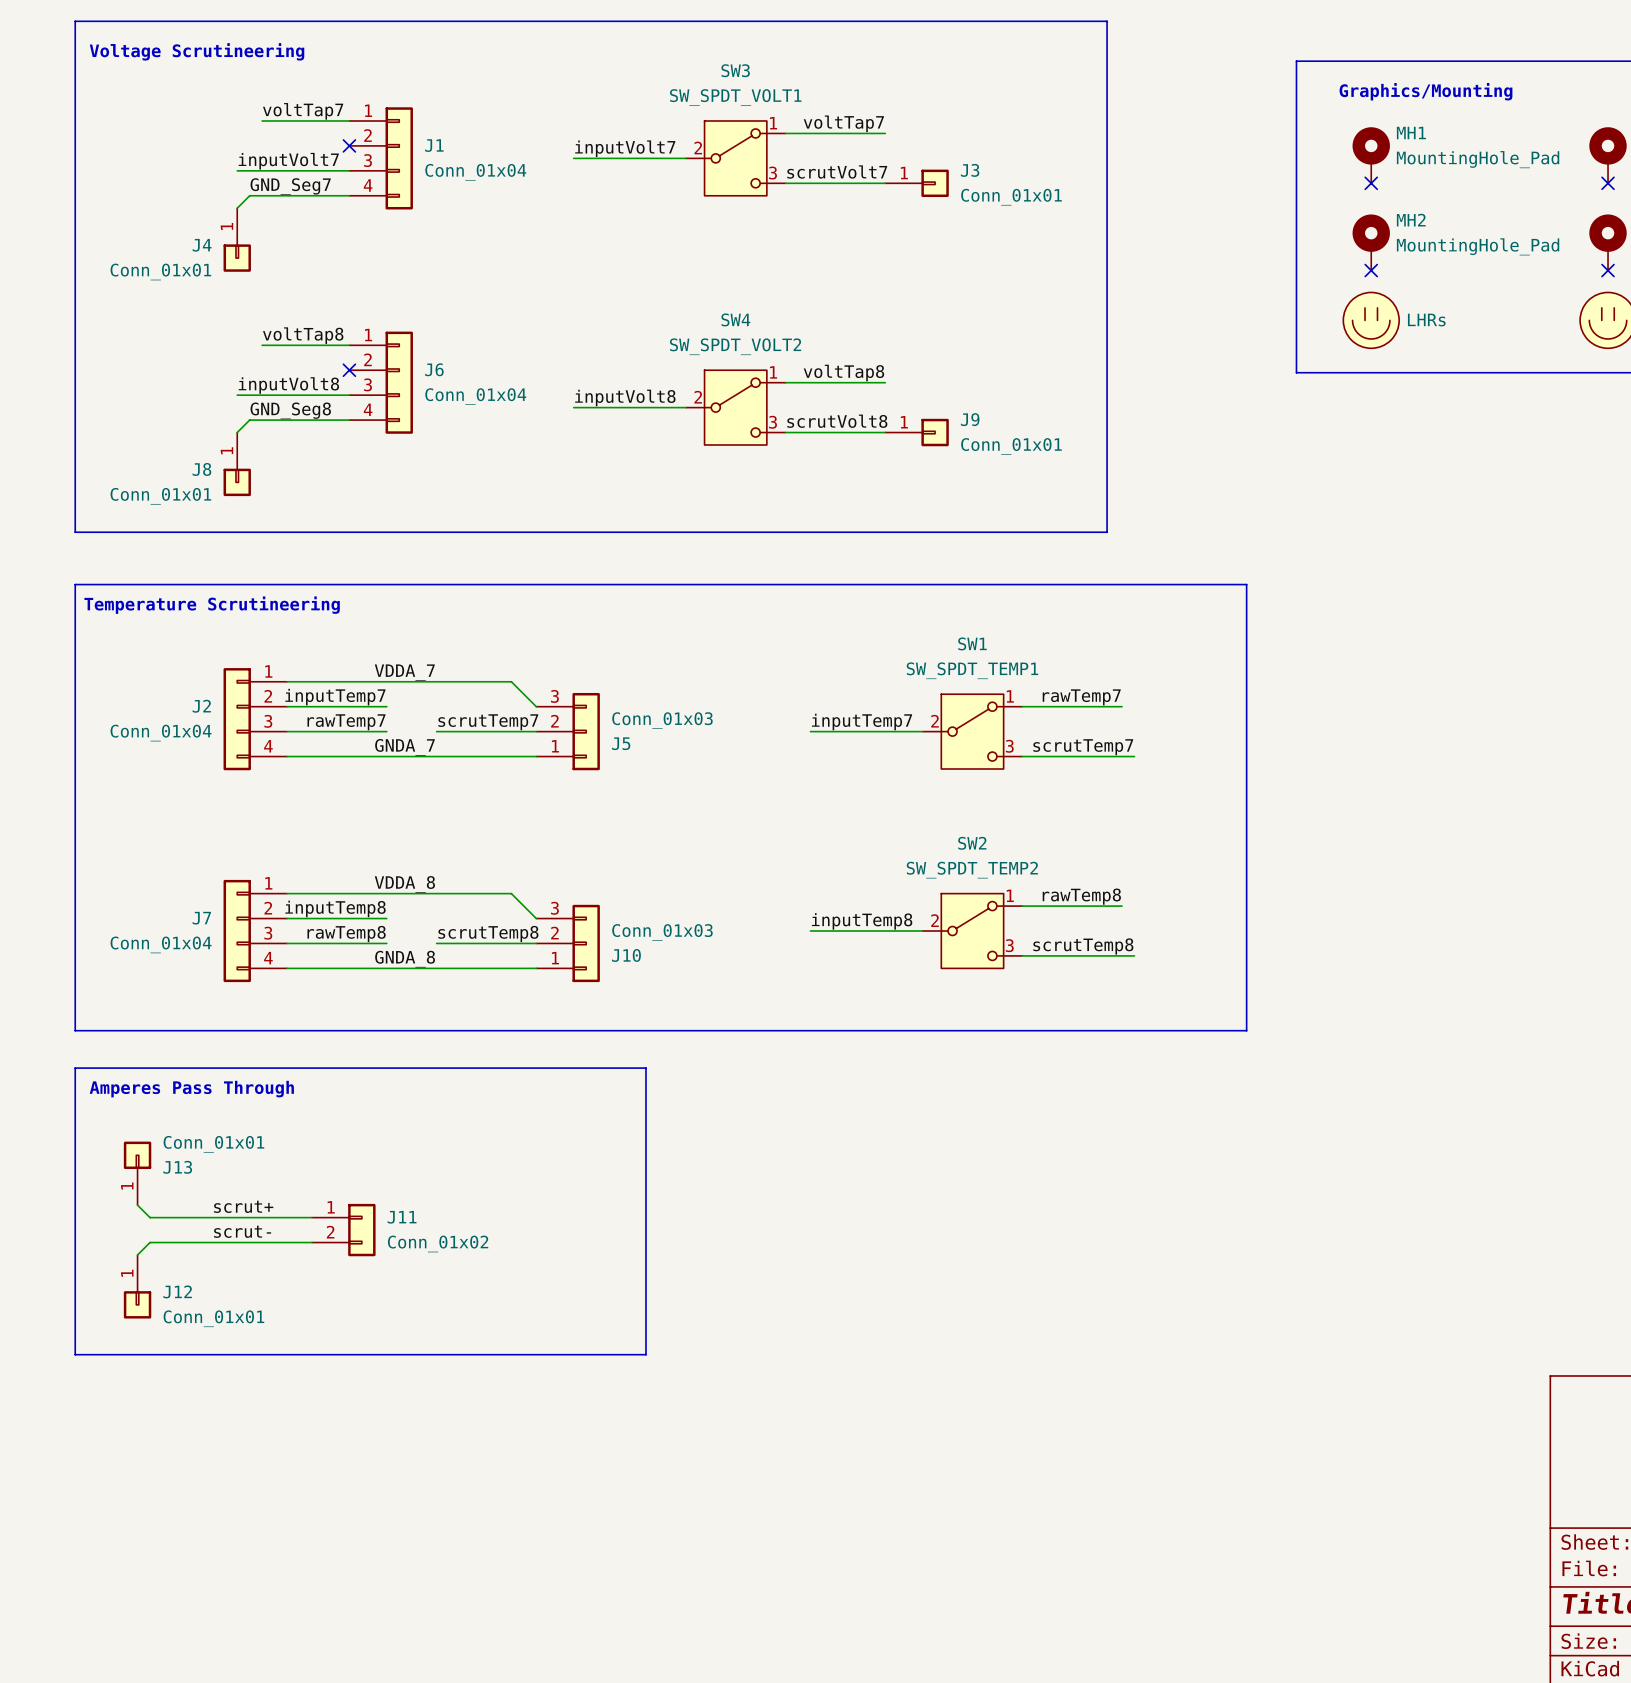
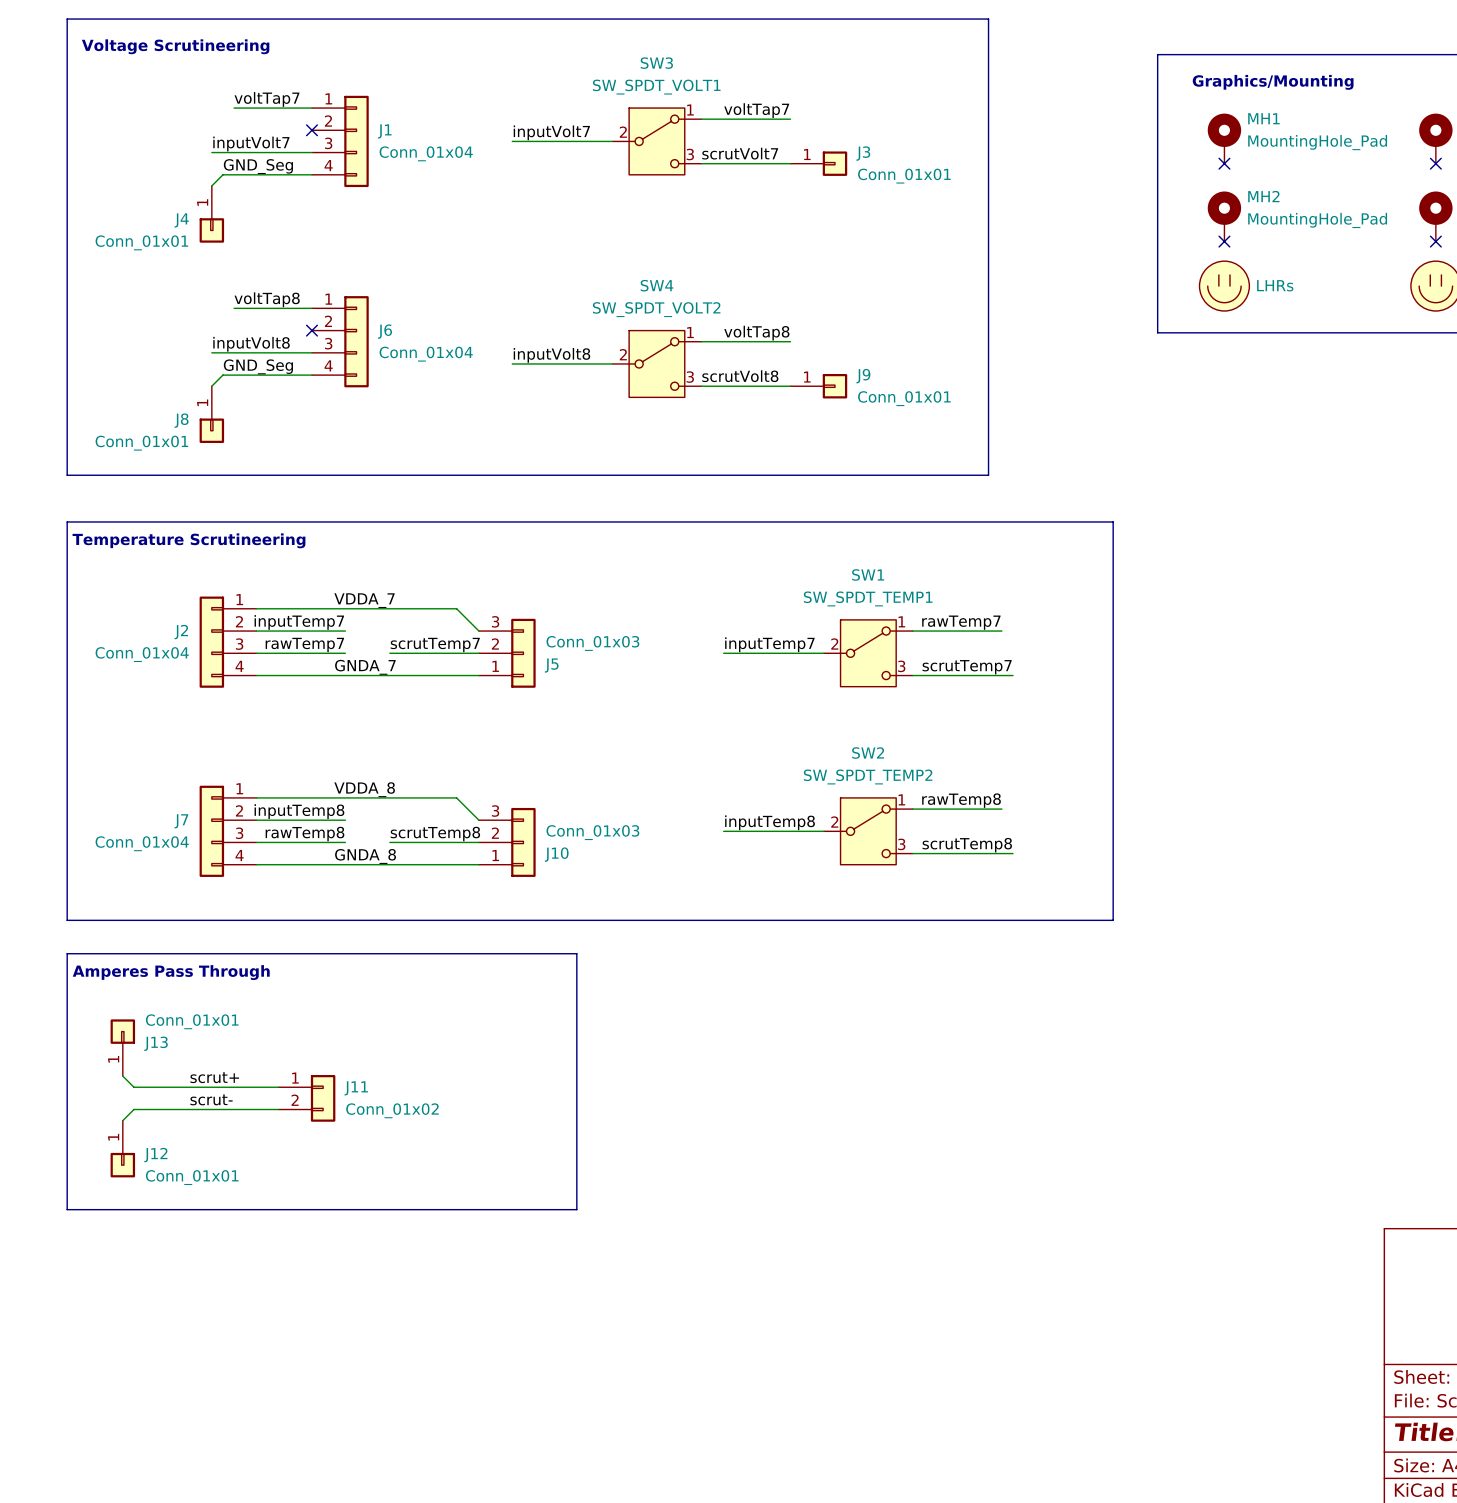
label: GND_Seg7 (290, 186) -> GND_Seg (258, 166)
label: GND_Seg8 (290, 410) -> GND_Seg (258, 366)

